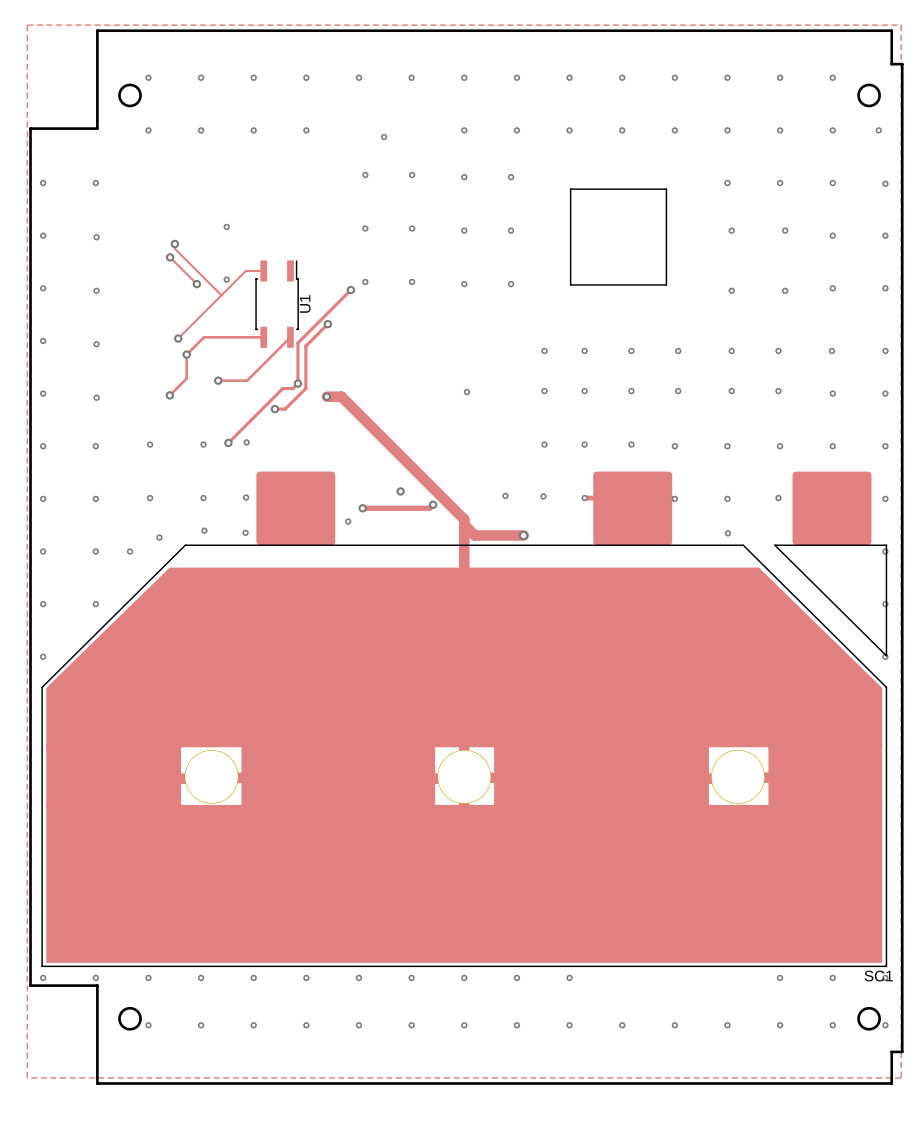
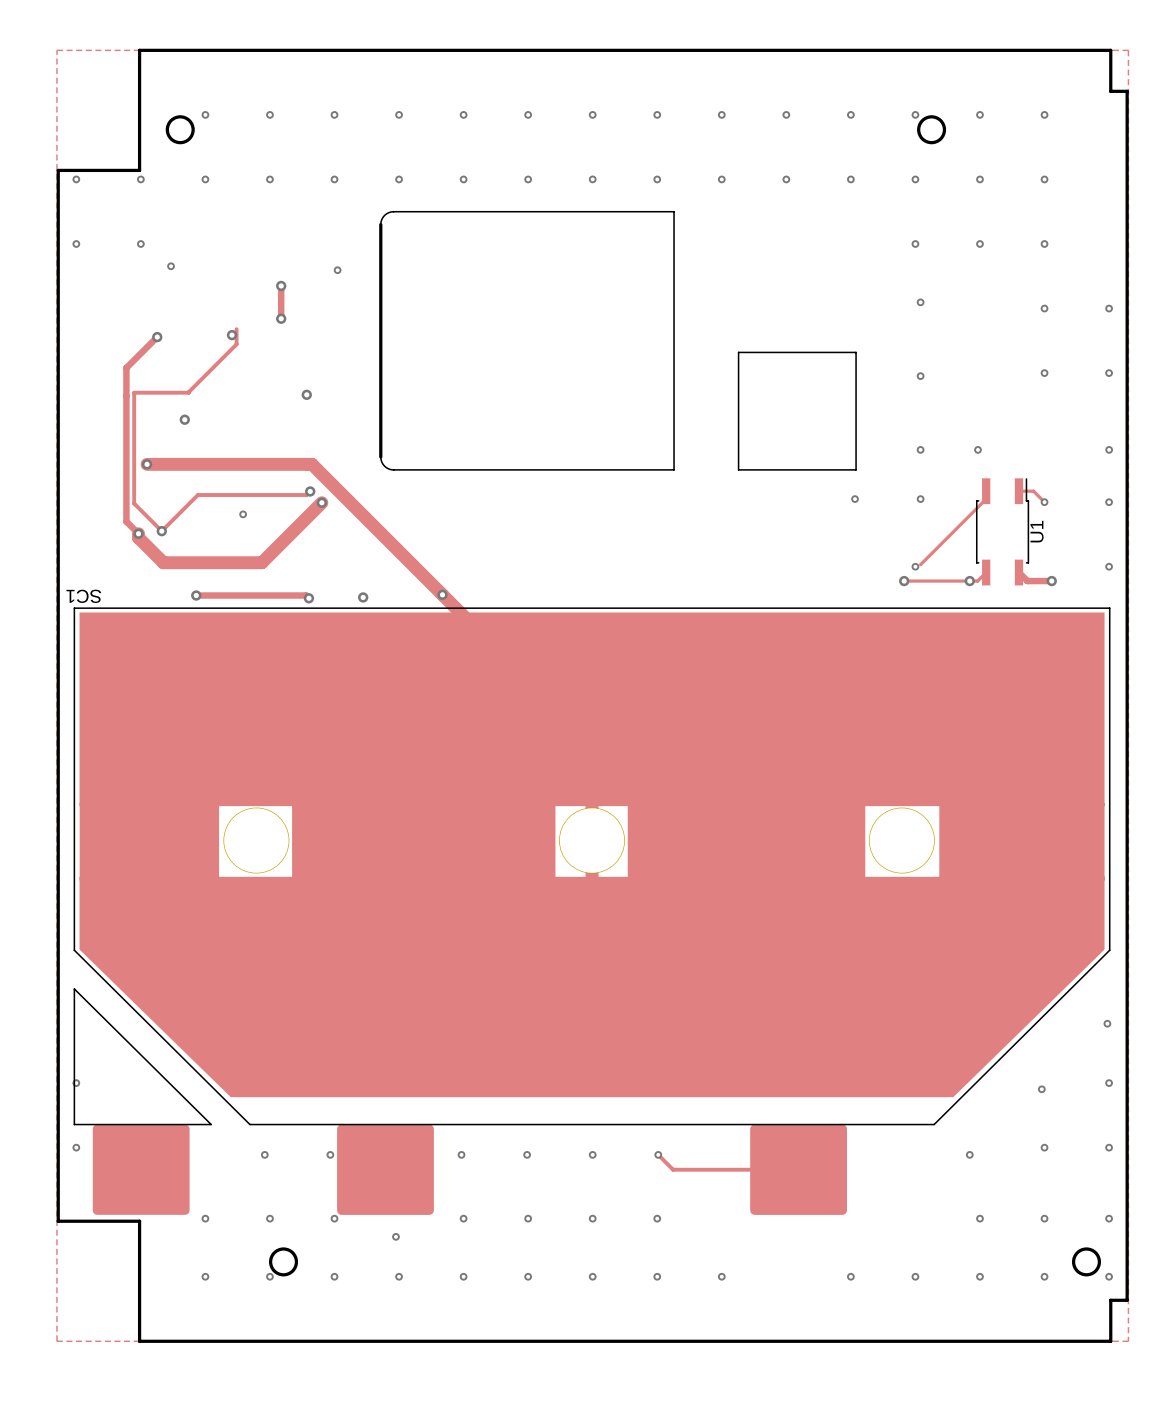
drawing shape: [29, 29, 904, 1085] -> [56, 48, 1129, 1343]
via: none -> (76, 179)
via: none -> (140, 179)
via: none -> (463, 179)
via: none -> (528, 179)
via: (878, 130) -> none
via: (384, 137) -> none
via: (365, 175) -> none
via: (412, 175) -> none
via: (464, 177) -> none
via: (511, 177) -> none
via: (885, 183) -> none
via: none -> (171, 266)
track: none -> (281, 285) (281, 318)
via: none -> (281, 285)
via position: (226, 226) -> (337, 270)
via: (365, 228) -> none
via: (412, 228) -> none
via: (464, 230) -> none
via: (511, 230) -> none
via: (785, 230) -> none
via: (43, 235) -> none
via: (96, 237) -> none
track: (174, 244) (174, 248) (221, 295) -> none
via: (174, 244) -> none
via: none -> (281, 318)
track: none -> (236, 329) (236, 344) (188, 392) (134, 392) (134, 503) (161, 531) (197, 495) (306, 495) (310, 491)
track: (170, 257) (196, 284) -> none
track: none -> (157, 337) (126, 367) (126, 521) (138, 533) (138, 537) (163, 562) (261, 562) (321, 502)
via: none -> (157, 337)
track: (263, 271) (245, 271) (178, 338) -> none
via: (226, 279) -> none
via: (365, 281) -> none
via: (412, 281) -> none
via: (196, 284) -> none
via: (464, 284) -> none
via: (511, 284) -> none
via: (43, 288) -> none
track: (350, 289) (297, 342) (297, 383) (292, 388) (282, 388) (228, 442) -> none
via: (350, 289) -> none
via: (96, 290) -> none
via: (785, 290) -> none
U1 position: (277, 304) -> (1002, 531)
via: none -> (306, 394)
track: (327, 324) (305, 346) (305, 388) (285, 409) (274, 409) -> none
via: (327, 324) -> none
via: none -> (184, 419)
track: (263, 337) (203, 337) (186, 354) (186, 378) -> none
track: (290, 337) (247, 380) (218, 380) -> none
via: (178, 338) -> none
via: (43, 340) -> none
via: (96, 344) -> none
via: (544, 350) -> none
via: (584, 350) -> none
via: (631, 350) -> none
via: (678, 350) -> none
via: (831, 350) -> none
via: (186, 354) -> none
track: none -> (147, 464) (312, 464) (557, 709) (592, 709) (592, 912)
via: none -> (147, 464)
track: (186, 378) (169, 395) -> none
via: (218, 380) -> none
via: (297, 383) -> none
via: none -> (310, 491)
track: none -> (986, 491) (986, 499) (920, 564)
track: none -> (1018, 491) (1033, 491) (1044, 502)
via: (544, 391) -> none
via: (584, 391) -> none
via: (631, 391) -> none
via: (778, 391) -> none
via: (466, 392) -> none
via: (43, 393) -> none
via: none -> (321, 502)
via: (169, 395) -> none
track: (326, 396) (341, 396) (464, 519) (464, 885) -> none
via: (326, 396) -> none
via: (96, 397) -> none
via: none -> (243, 514)
via: (274, 409) -> none
via: none -> (161, 531)
via: none -> (138, 533)
via: (228, 442) -> none
via: (246, 442) -> none
via: (150, 444) -> none
via: (203, 444) -> none
via: (544, 444) -> none
via: (584, 444) -> none
via: (631, 444) -> none
via: (43, 446) -> none
via: (95, 446) -> none
via: (674, 446) -> none
via: (780, 446) -> none
via: (832, 446) -> none
track: none -> (986, 572) (977, 581) (904, 581)
track: none -> (1018, 572) (1027, 581) (1051, 581)
via: none -> (904, 581)
via: none -> (969, 581)
via: none -> (1051, 581)
track: none -> (196, 595) (306, 595) (308, 598)
via: none -> (196, 595)
via: none -> (442, 594)
via: none -> (308, 598)
via: none -> (363, 597)
via: (400, 491) -> none
via: (505, 495) -> none
via: (543, 496) -> none
via: (246, 497) -> none
via: (43, 498) -> none
via: (95, 498) -> none
via: (150, 498) -> none
via: (203, 498) -> none
via: (584, 498) -> none
via: (674, 498) -> none
via: (727, 498) -> none
via: (778, 498) -> none
via: (885, 498) -> none
track: (433, 504) (429, 508) (362, 508) -> none
via: (433, 504) -> none
via: (362, 508) -> none
via: (348, 521) -> none
track: (464, 524) (474, 535) (523, 535) -> none
via: (204, 530) -> none
via: (245, 532) -> none
via: (727, 533) -> none
via: (523, 535) -> none
via: (159, 537) -> none
via: (43, 551) -> none
via: (95, 551) -> none
via: (130, 551) -> none
via: (885, 551) -> none
via: (43, 604) -> none
via: (95, 604) -> none
via: (885, 604) -> none
via: (43, 656) -> none
via: (885, 656) -> none
SC1 rotation: 0° (464, 719) -> 180° (592, 911)
via: none -> (1107, 1023)
via: none -> (76, 1083)
via: none -> (1109, 1083)
via: none -> (1041, 1089)
via: none -> (76, 1147)
via: none -> (1044, 1147)
via: none -> (1109, 1147)
via: none -> (264, 1154)
via: none -> (330, 1154)
via: none -> (461, 1154)
via: none -> (527, 1154)
via: none -> (592, 1154)
track: none -> (658, 1154) (673, 1169) (798, 1169)
via: none -> (658, 1154)
via: none -> (969, 1154)
via: (43, 977) -> none
via: (95, 977) -> none
via position: (306, 977) -> (395, 1236)
via: (569, 977) -> none
via: (622, 1025) -> none

